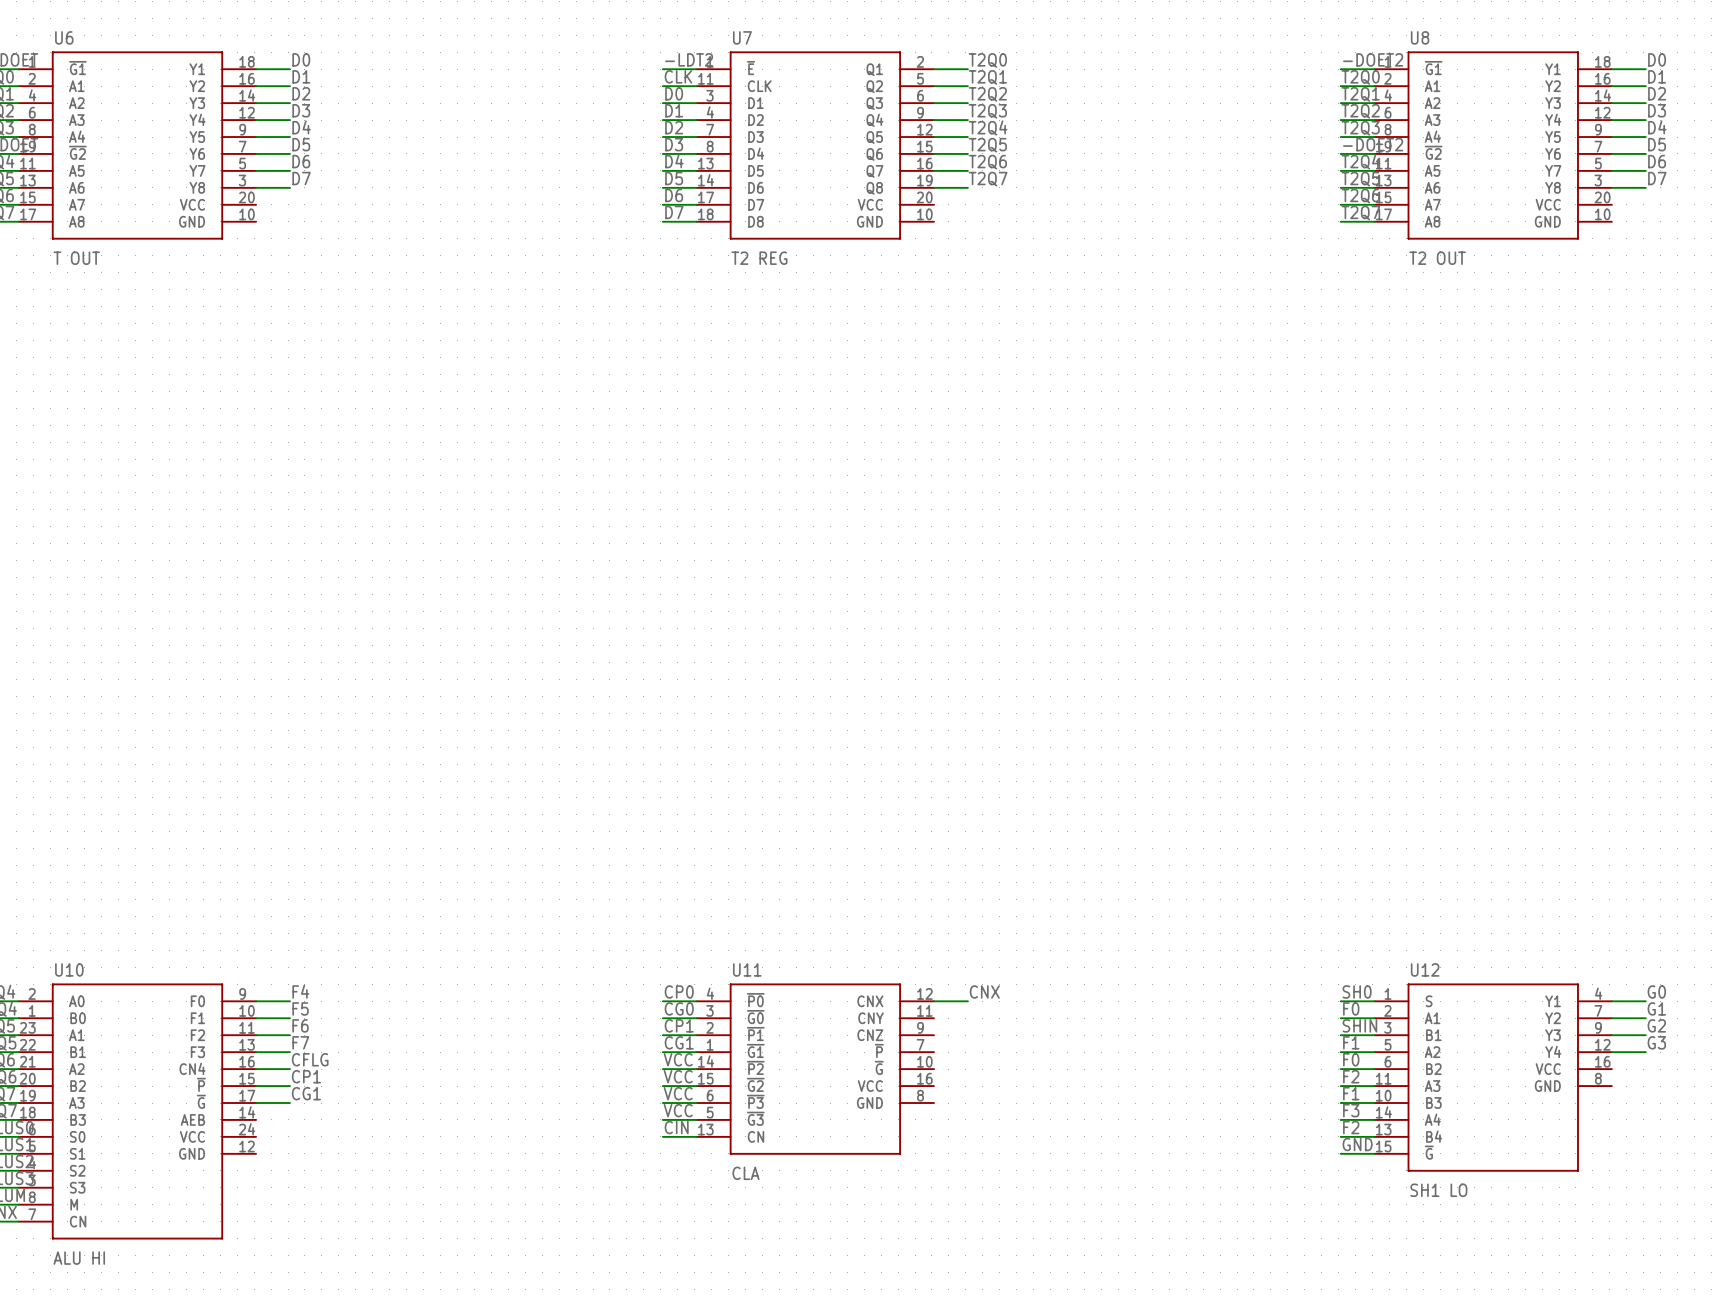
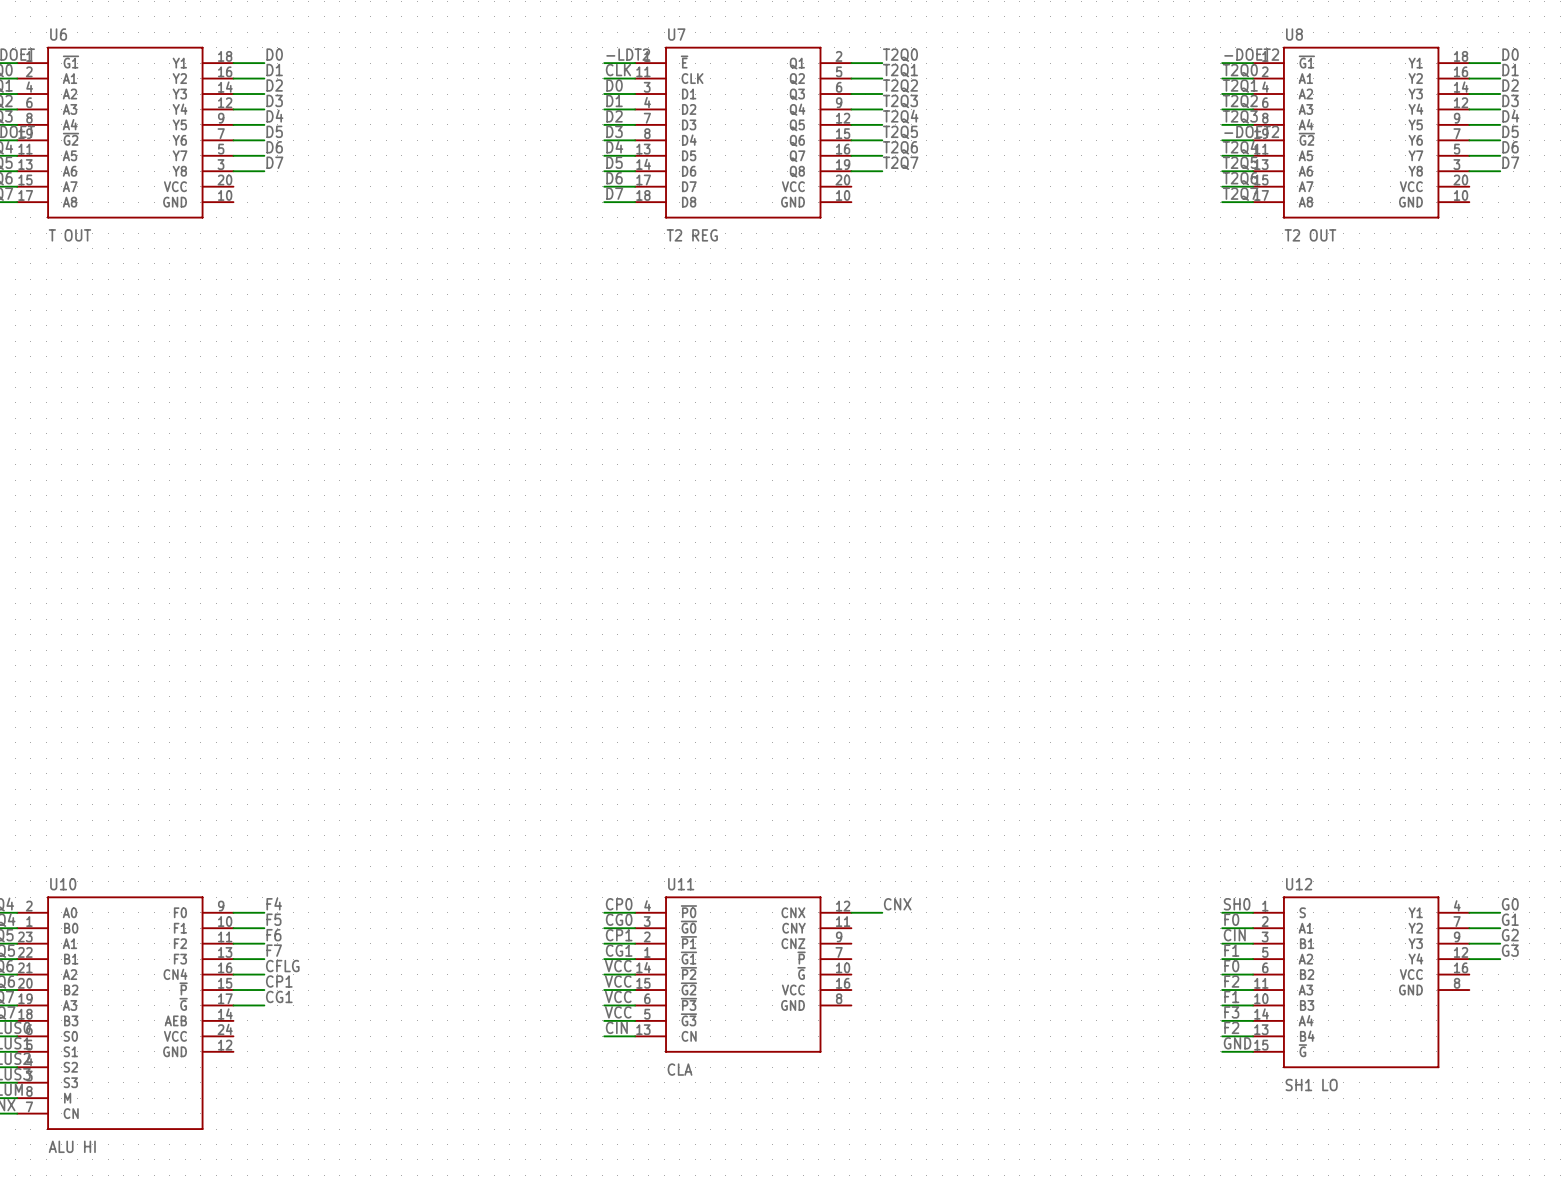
label: SHIN (1359, 1025) -> CIN (1234, 935)

